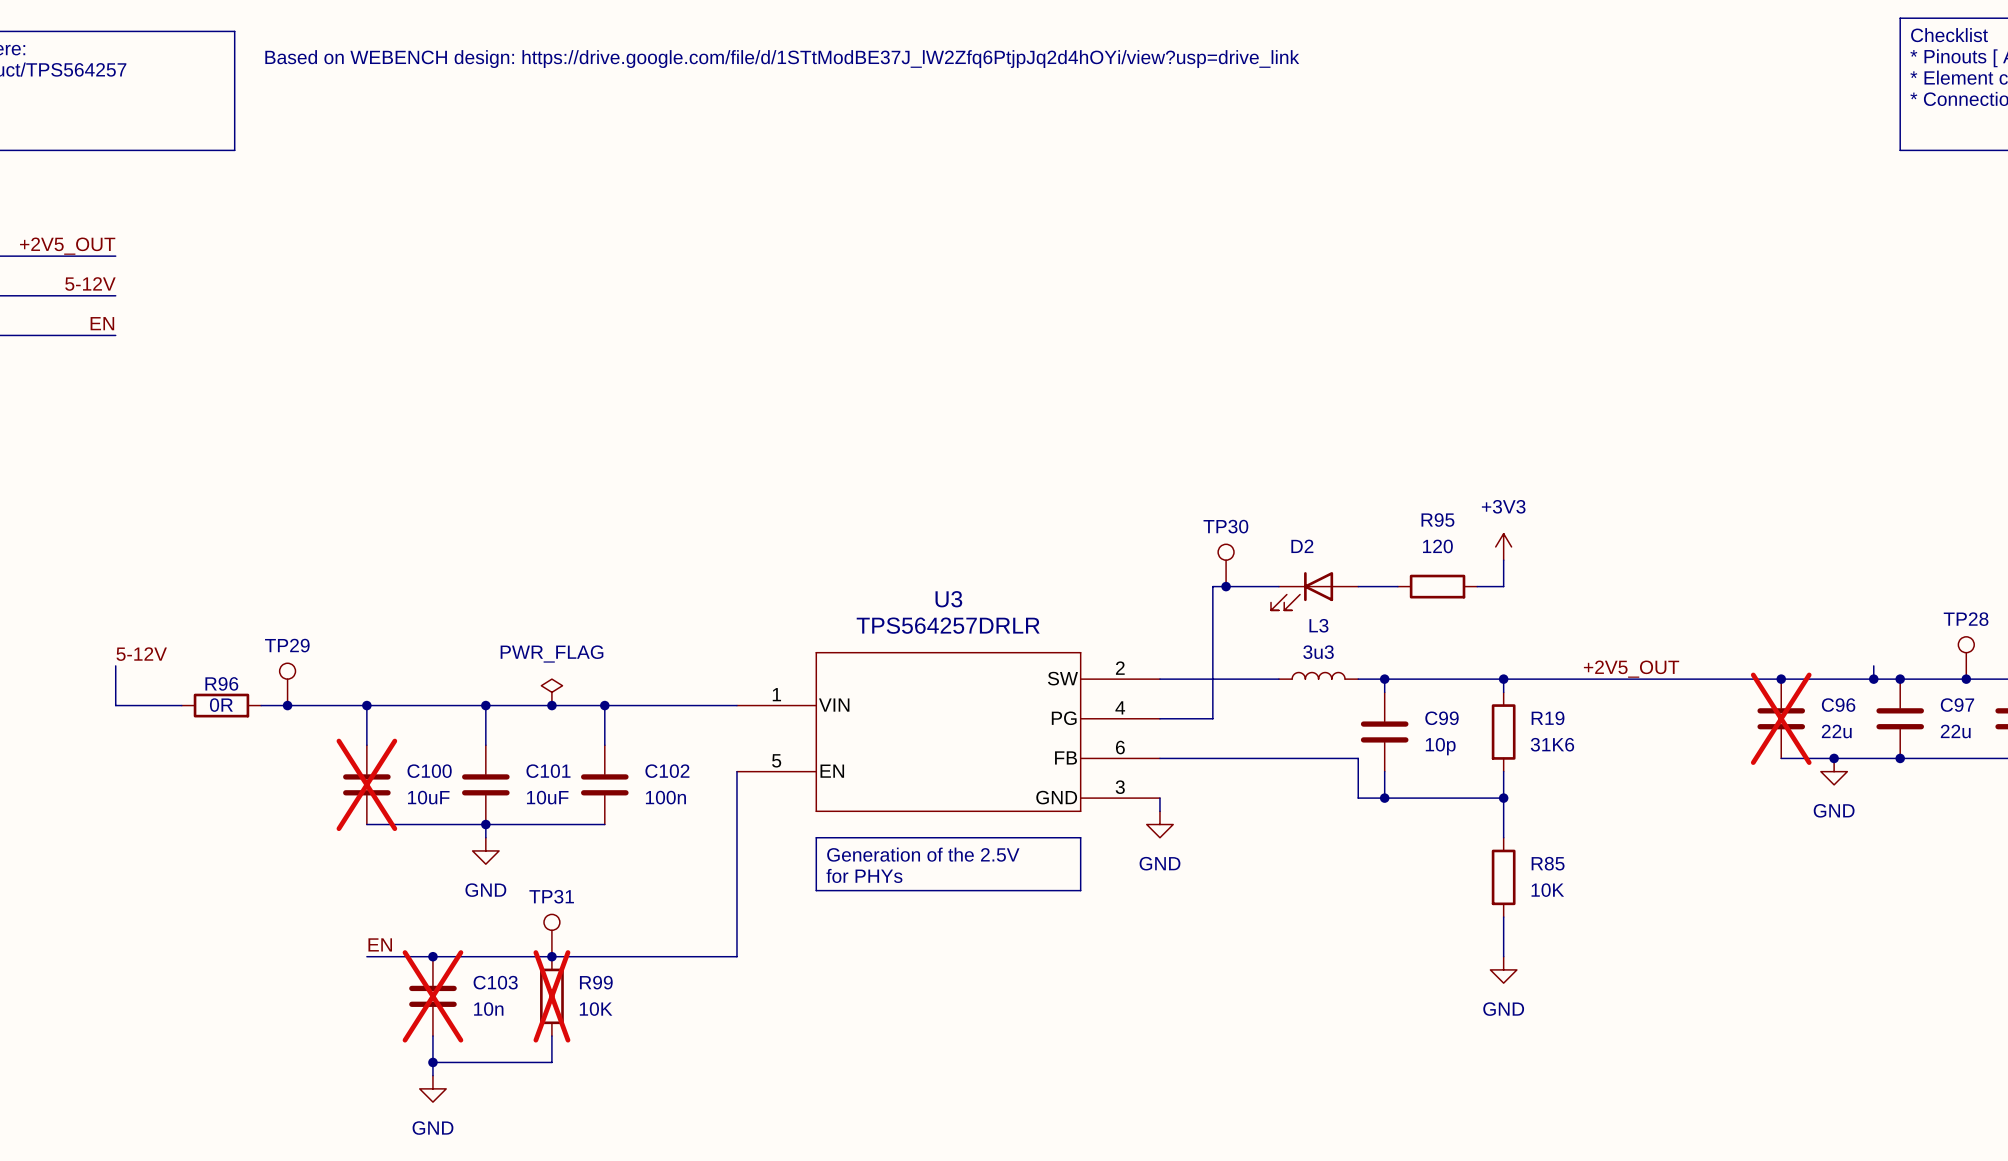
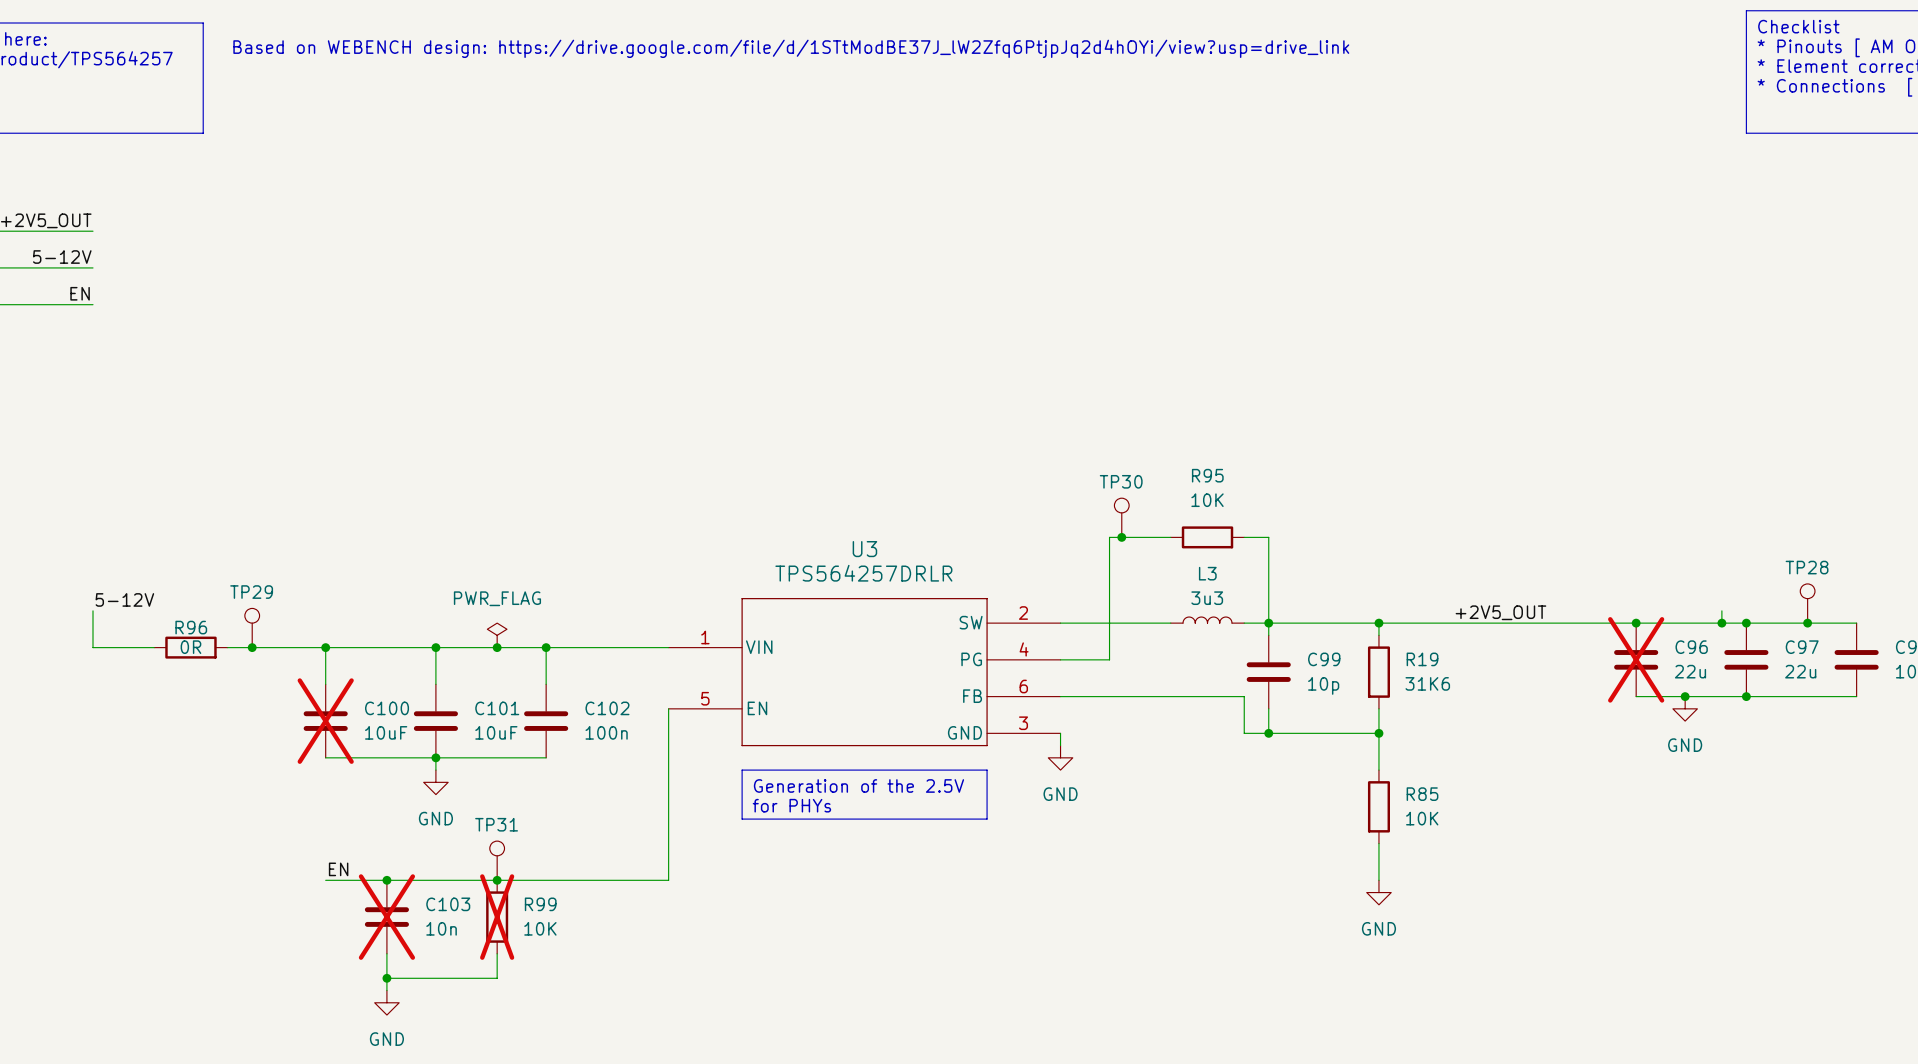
R95 value: 120 (1437, 546) -> 10K (1207, 500)
power symbol: +3V3 (1503, 546) -> none
wire: (1503, 560) (1503, 586) (1477, 586) -> none
wire: (1384, 586) (1397, 586) -> (1268, 537) (1268, 623)
R95 position: (1437, 586) -> (1207, 537)
D2: (1314, 591) -> none

